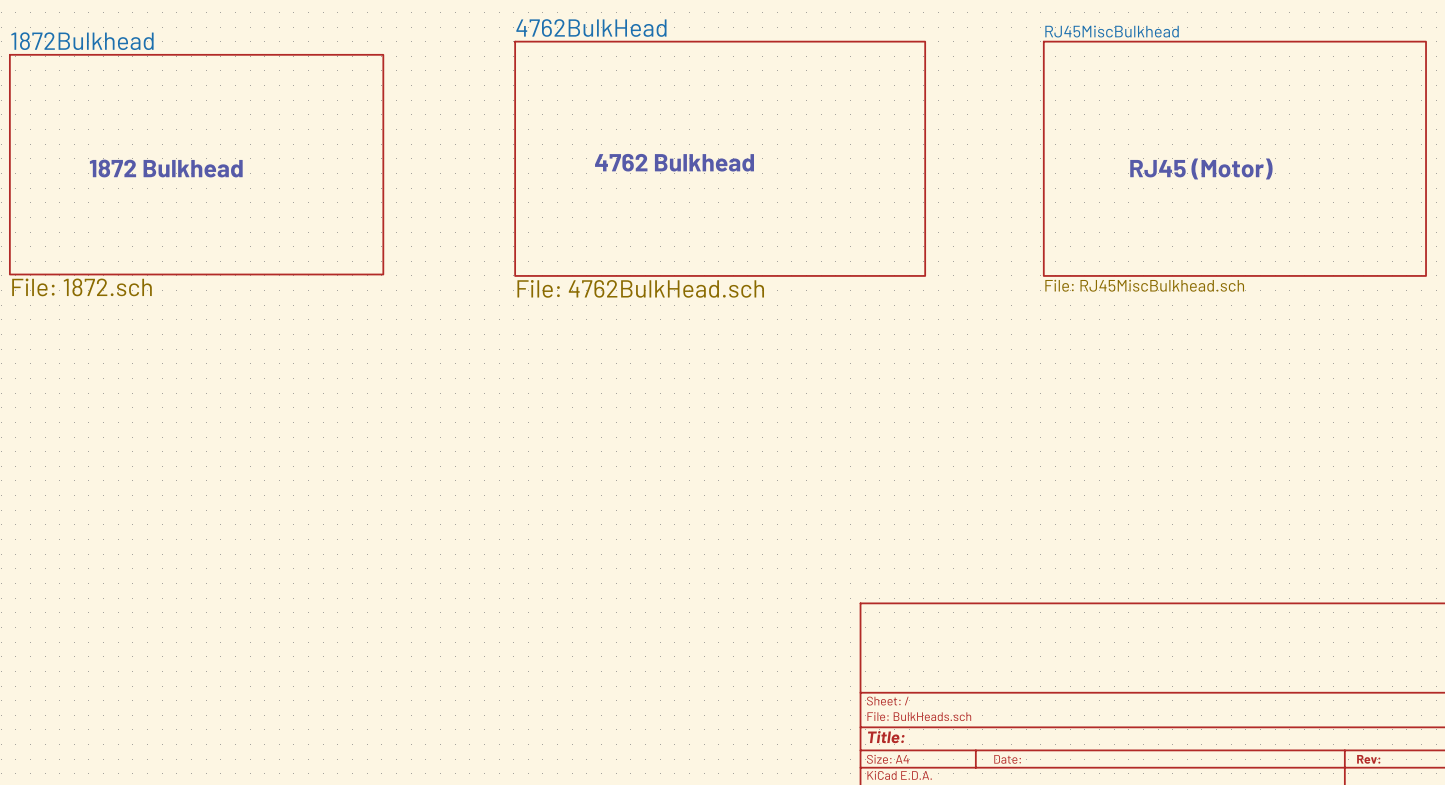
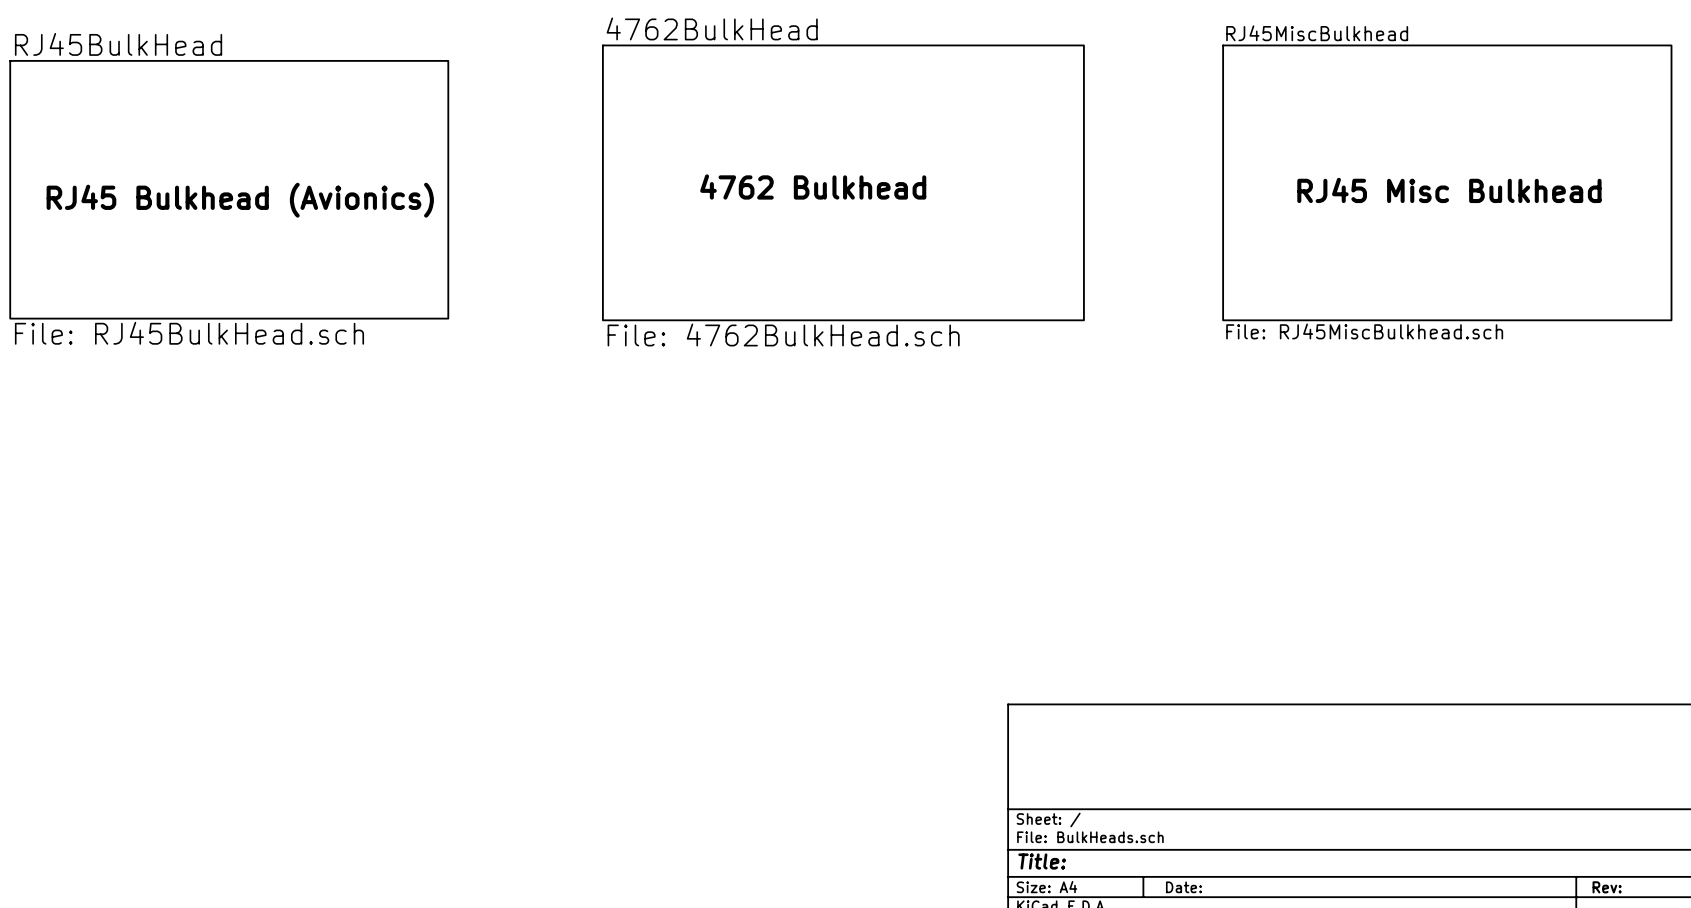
sheet 1872Bulkhead name: 1872Bulkhead (82, 41) -> RJ45BulkHead (118, 44)
text: none -> RJ45 Misc Bulkhead (1449, 190)
text: 1872 Bulkhead (166, 168) -> none
text: RJ45 (Motor) (1201, 168) -> none
text: none -> RJ45 Bulkhead (Avionics) (240, 200)
sheet 1872Bulkhead value: File: 1872.sch (82, 287) -> File: RJ45BulkHead.sch (189, 333)

